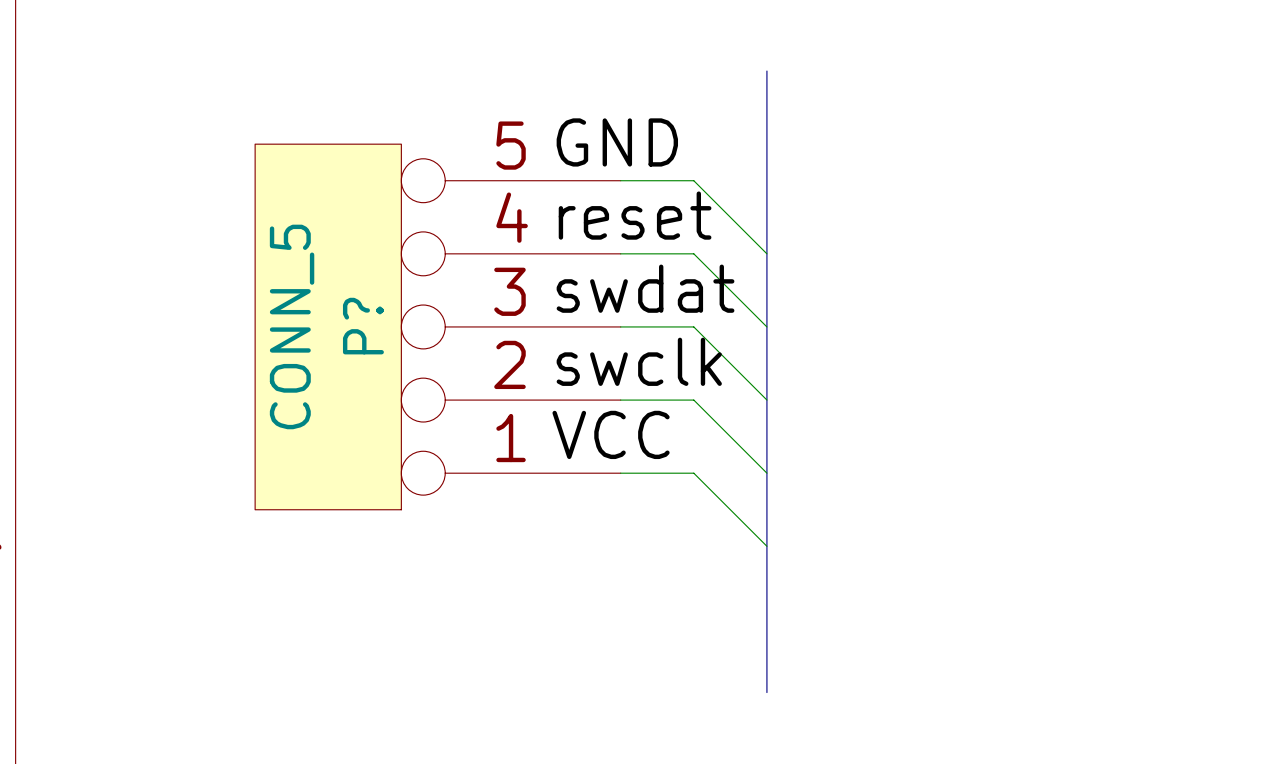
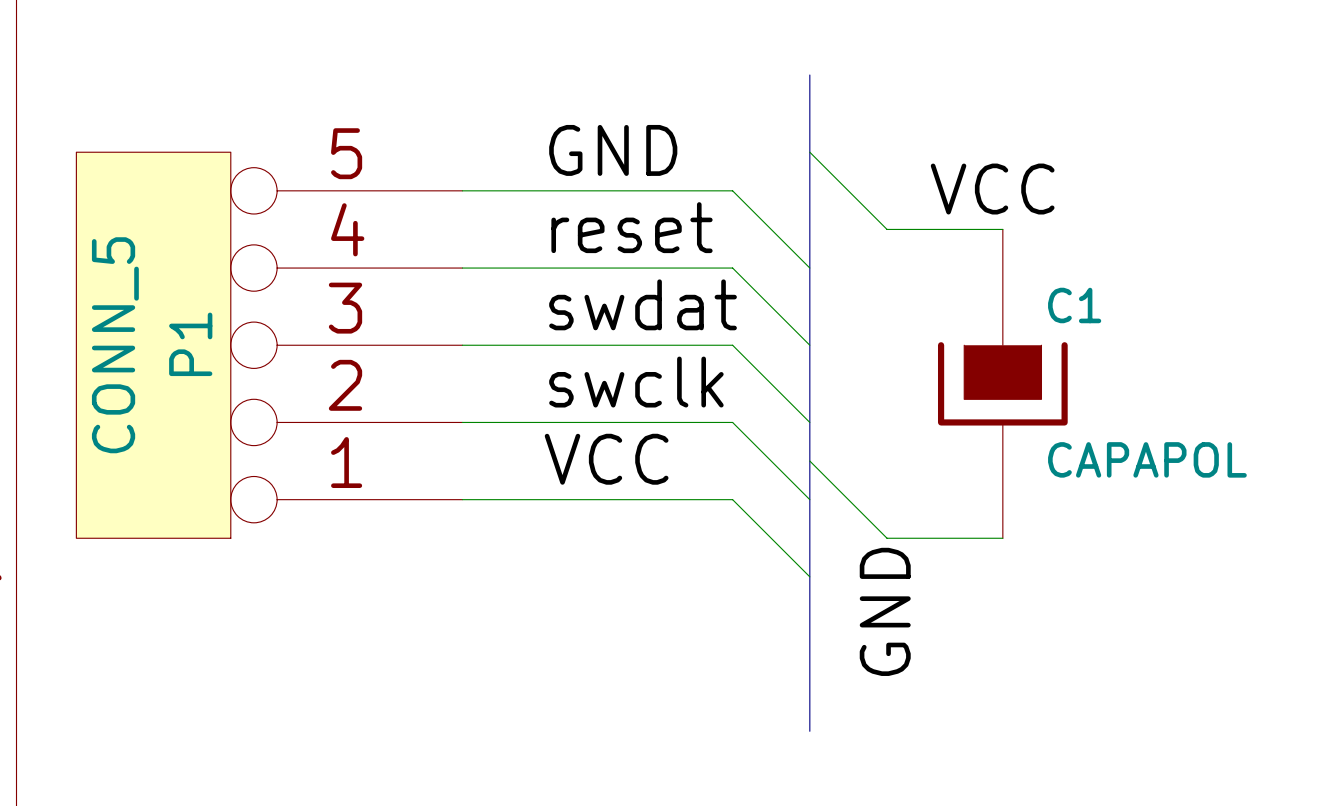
label position: GND (617, 142) -> GND (613, 150)
wire: none -> (809, 152) (887, 229) (1002, 229)
label: none -> VCC (992, 189)
label position: reset (635, 215) -> reset (631, 227)
label position: swdat (645, 288) -> swdat (643, 304)
P1: none -> CONN_5 (269, 345)
P?: CONN_5 (437, 326) -> none
label position: swclk (639, 361) -> swclk (636, 382)
C1: none -> CAPAPOL (1002, 383)
label position: VCC (611, 434) -> VCC (606, 459)
wire: none -> (809, 461) (887, 538) (1002, 538)
label: none -> GND (885, 611)

